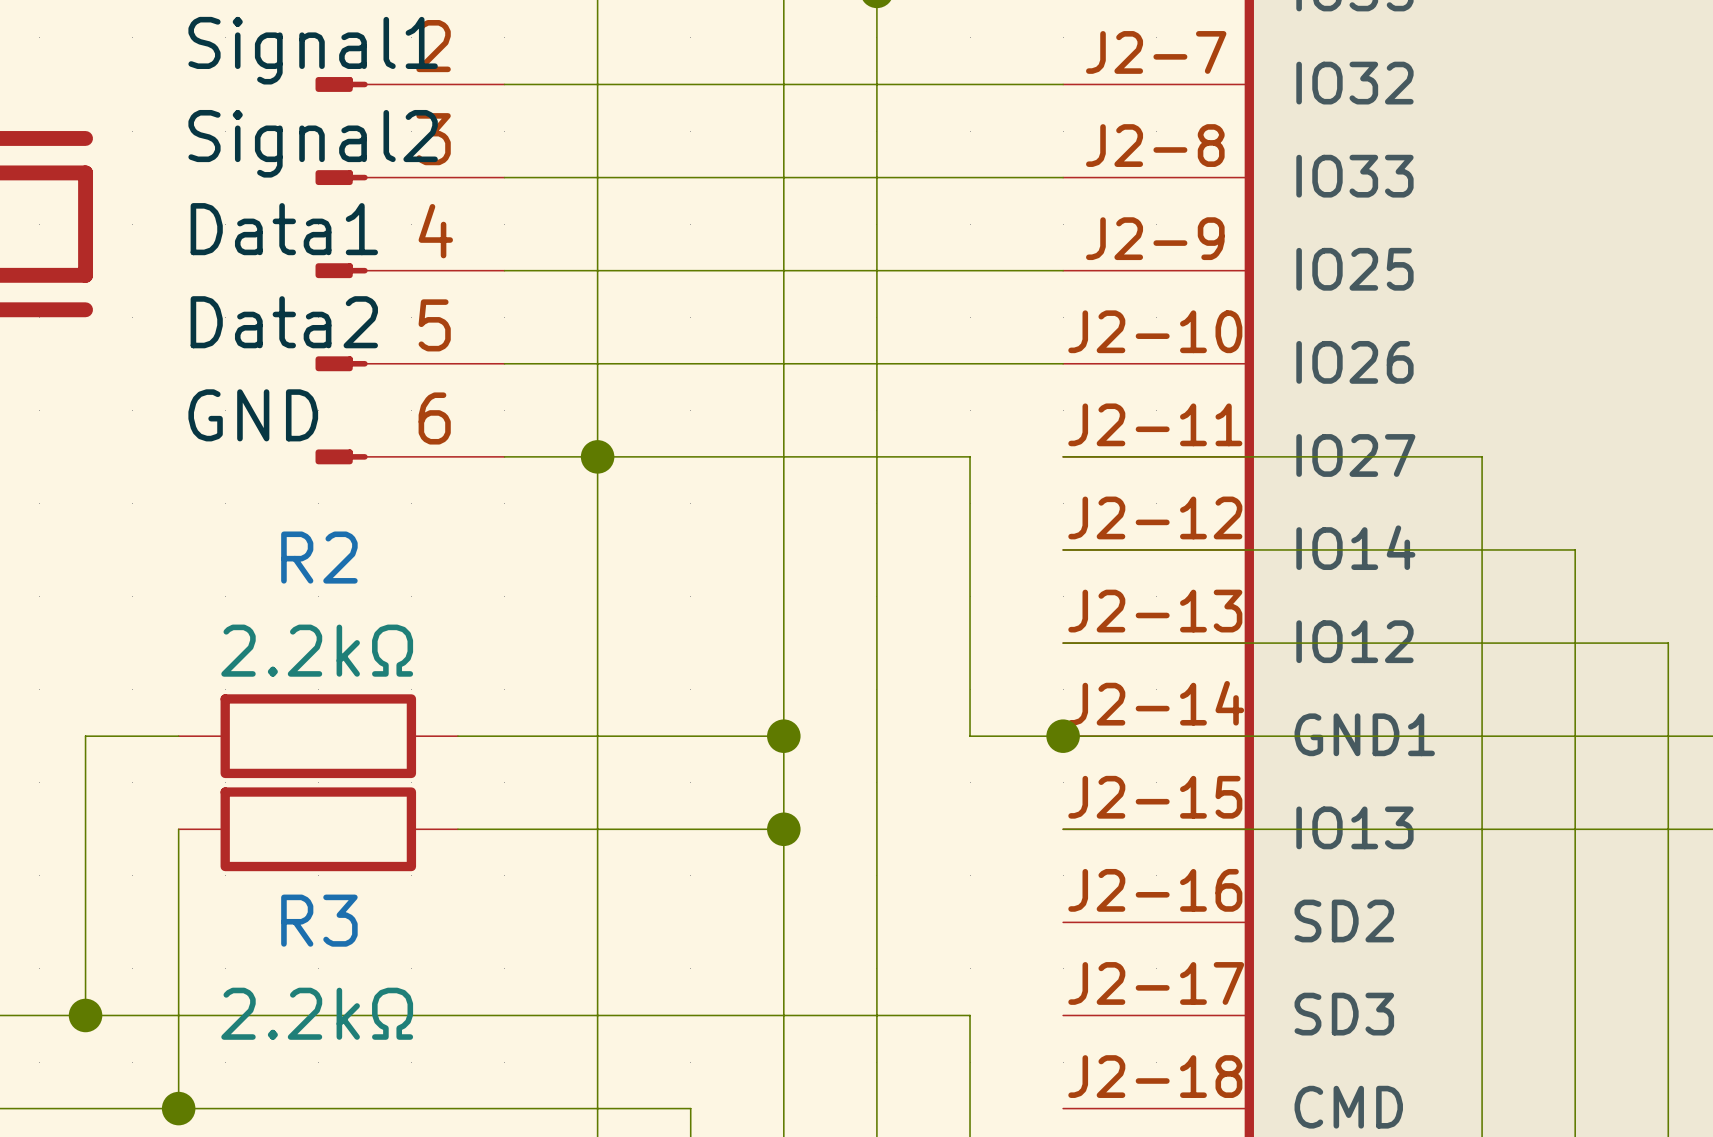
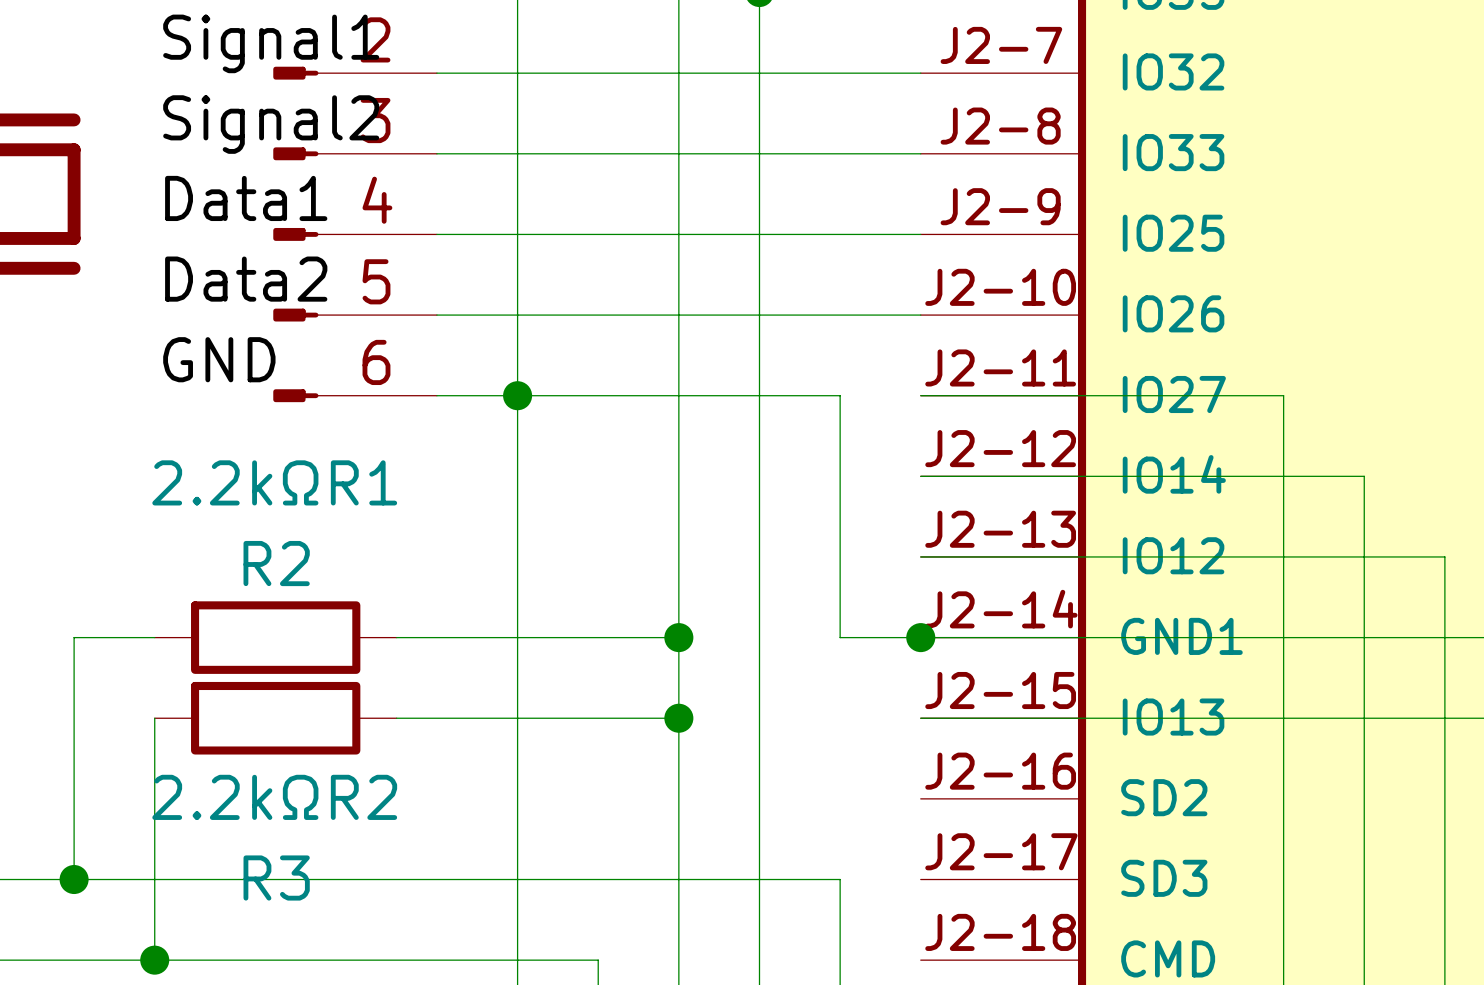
R2 name: R2 (319, 557) -> 2.2kΩR1 (274, 482)
R2 value: 2.2kΩ (317, 650) -> R2 (276, 563)
R3 name: R3 (319, 920) -> 2.2kΩR2 (274, 797)
R3 value: 2.2kΩ (317, 1013) -> R3 (276, 878)

